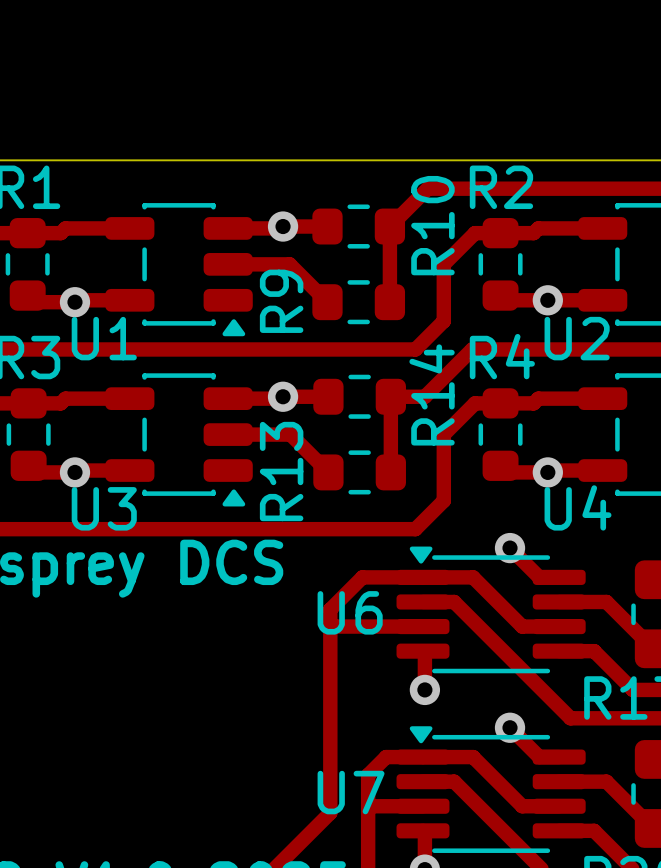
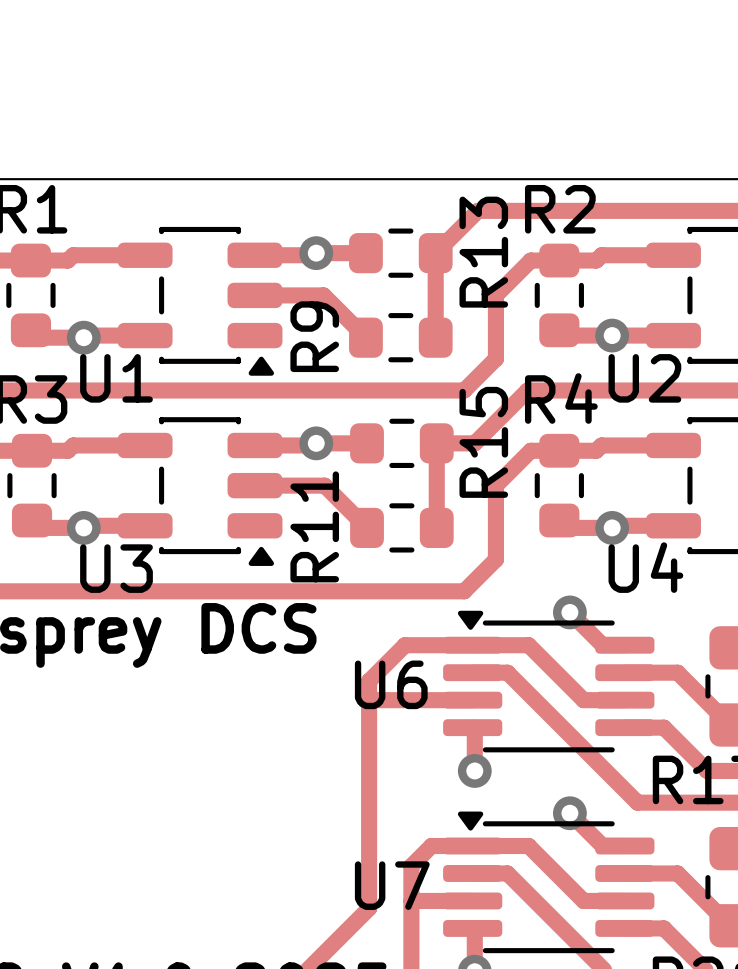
R10 name: R10 (432, 225) -> R13 (483, 252)
R14 name: R14 (432, 394) -> R15 (483, 442)
R13 name: R13 (281, 471) -> R11 (314, 526)

